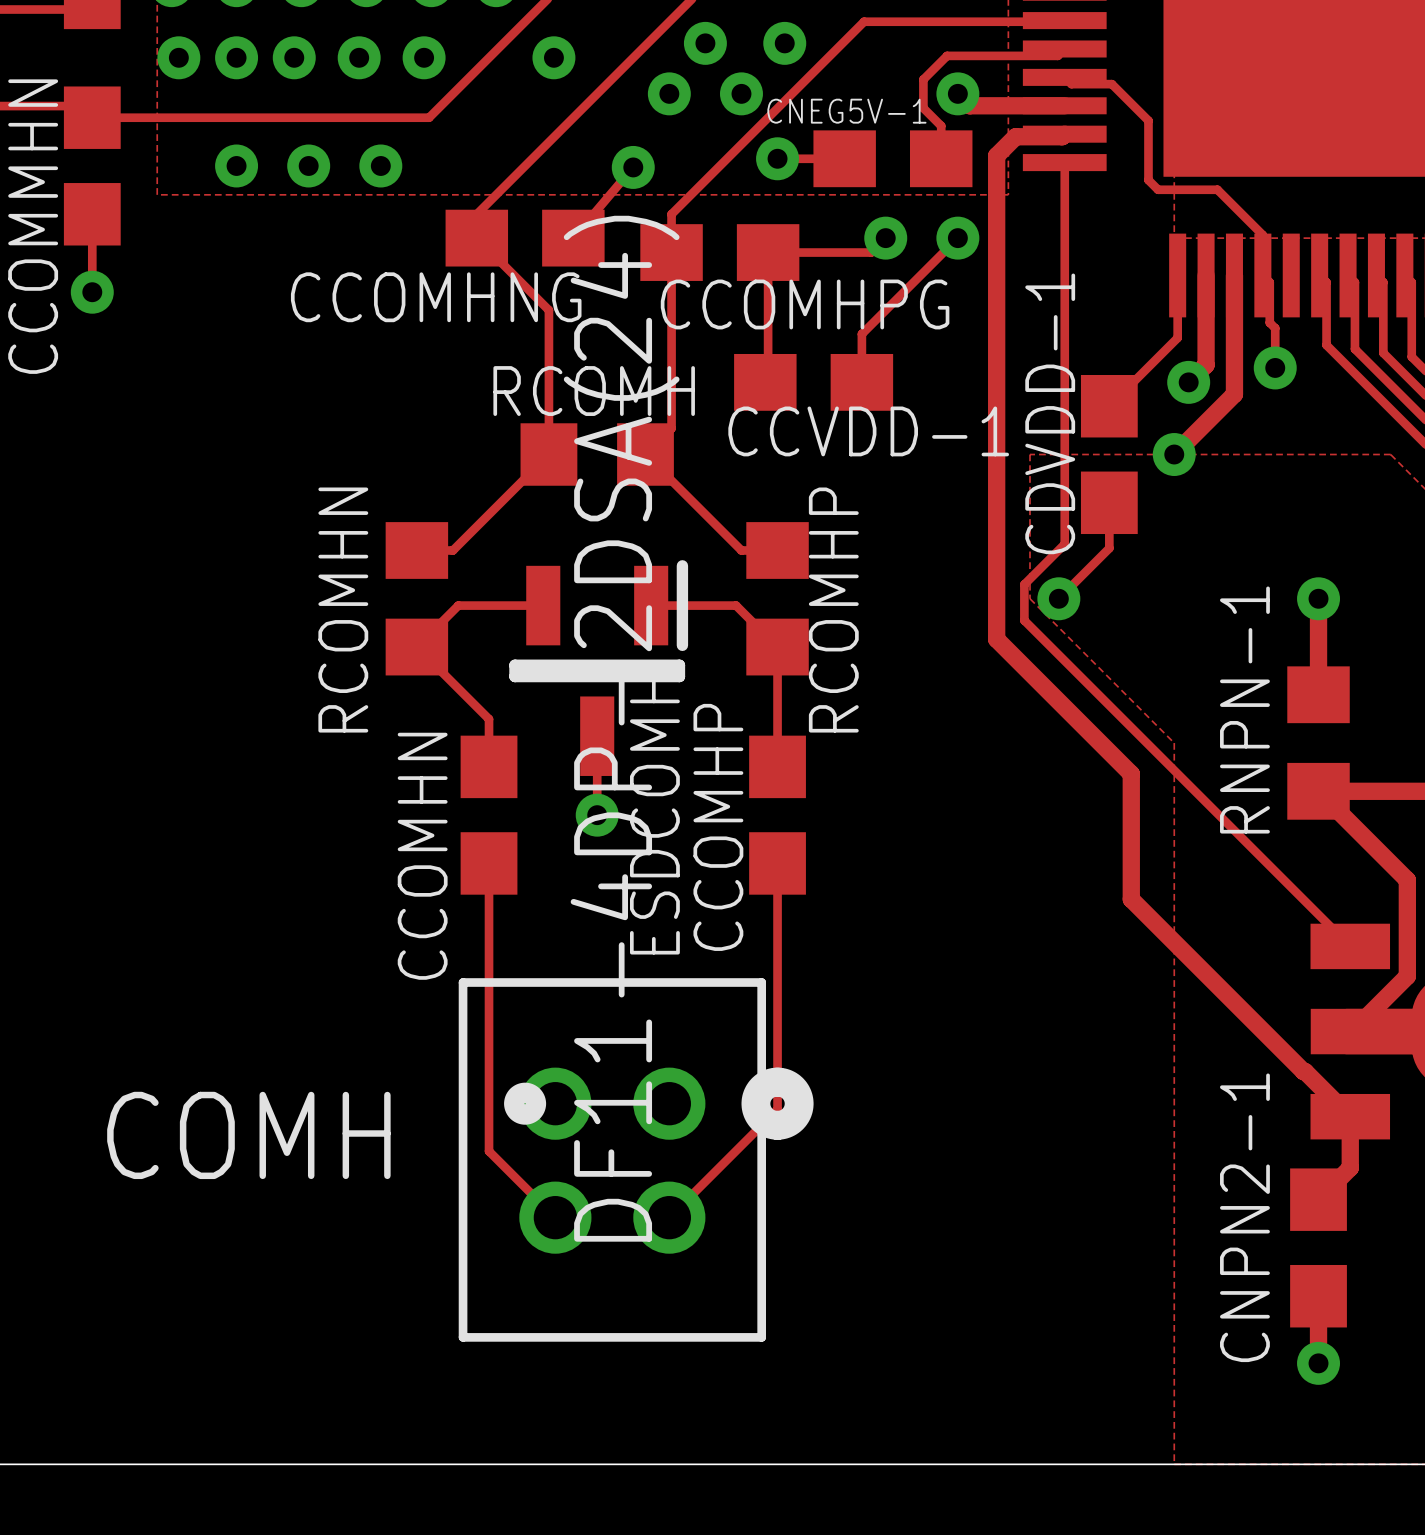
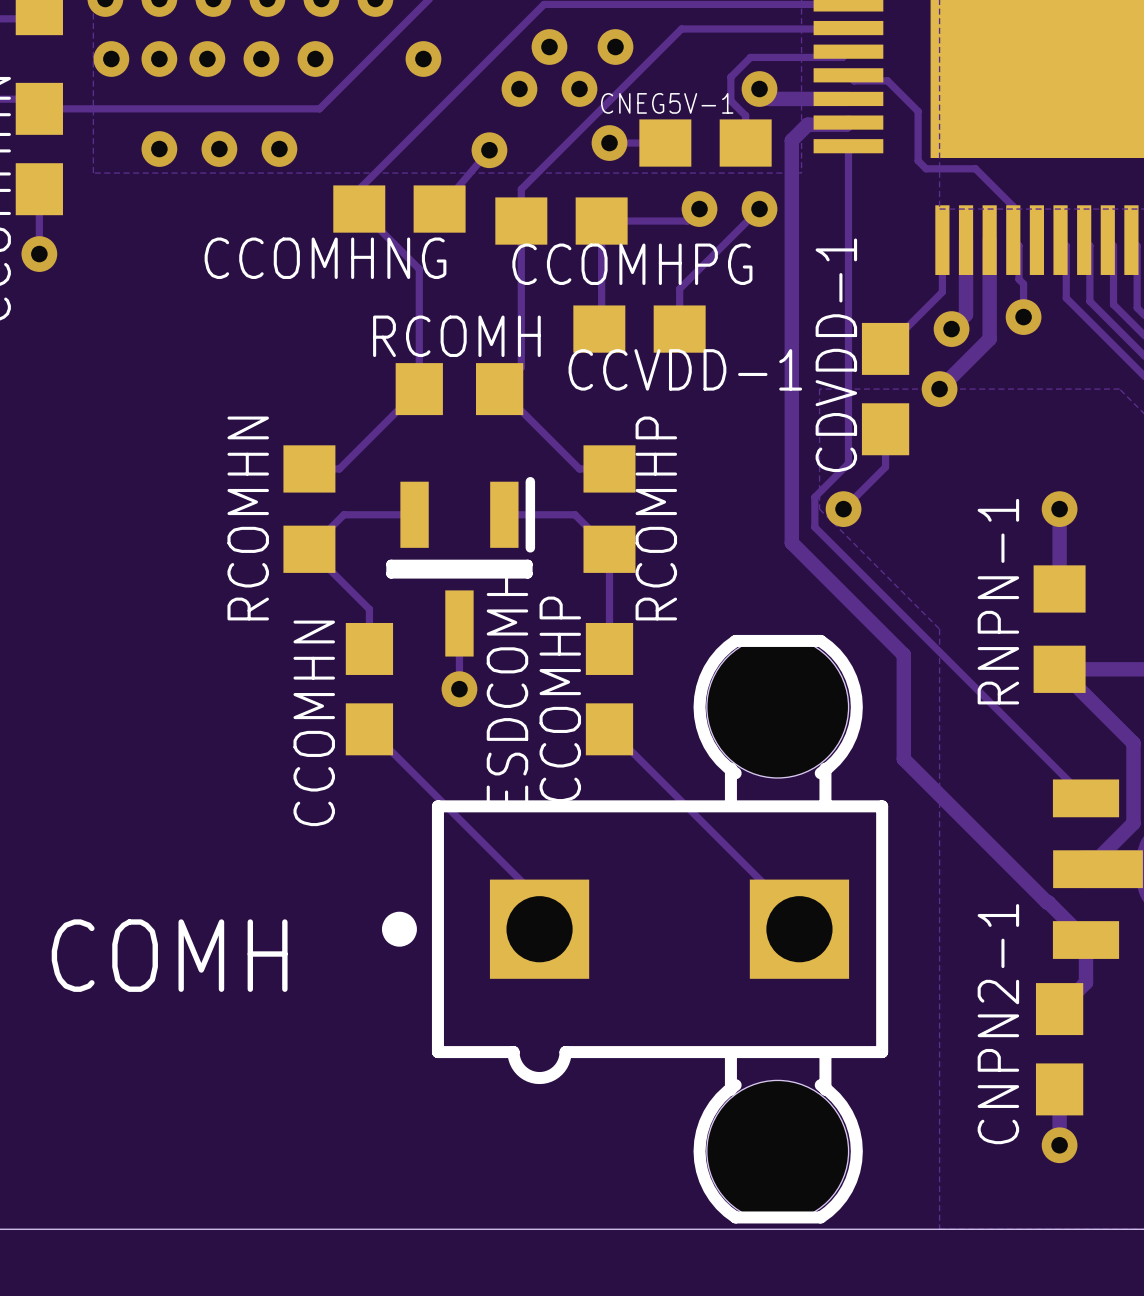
track: (489, 863) (489, 1151) (555, 1217) -> (369, 729) (539, 899) (539, 929)
track: (777, 863) (777, 1109) (669, 1217) -> (609, 729) (799, 919) (799, 929)
part: none -> (660, 929)
part: DF11-4DP-2DSA(24) (636, 1159) -> none

